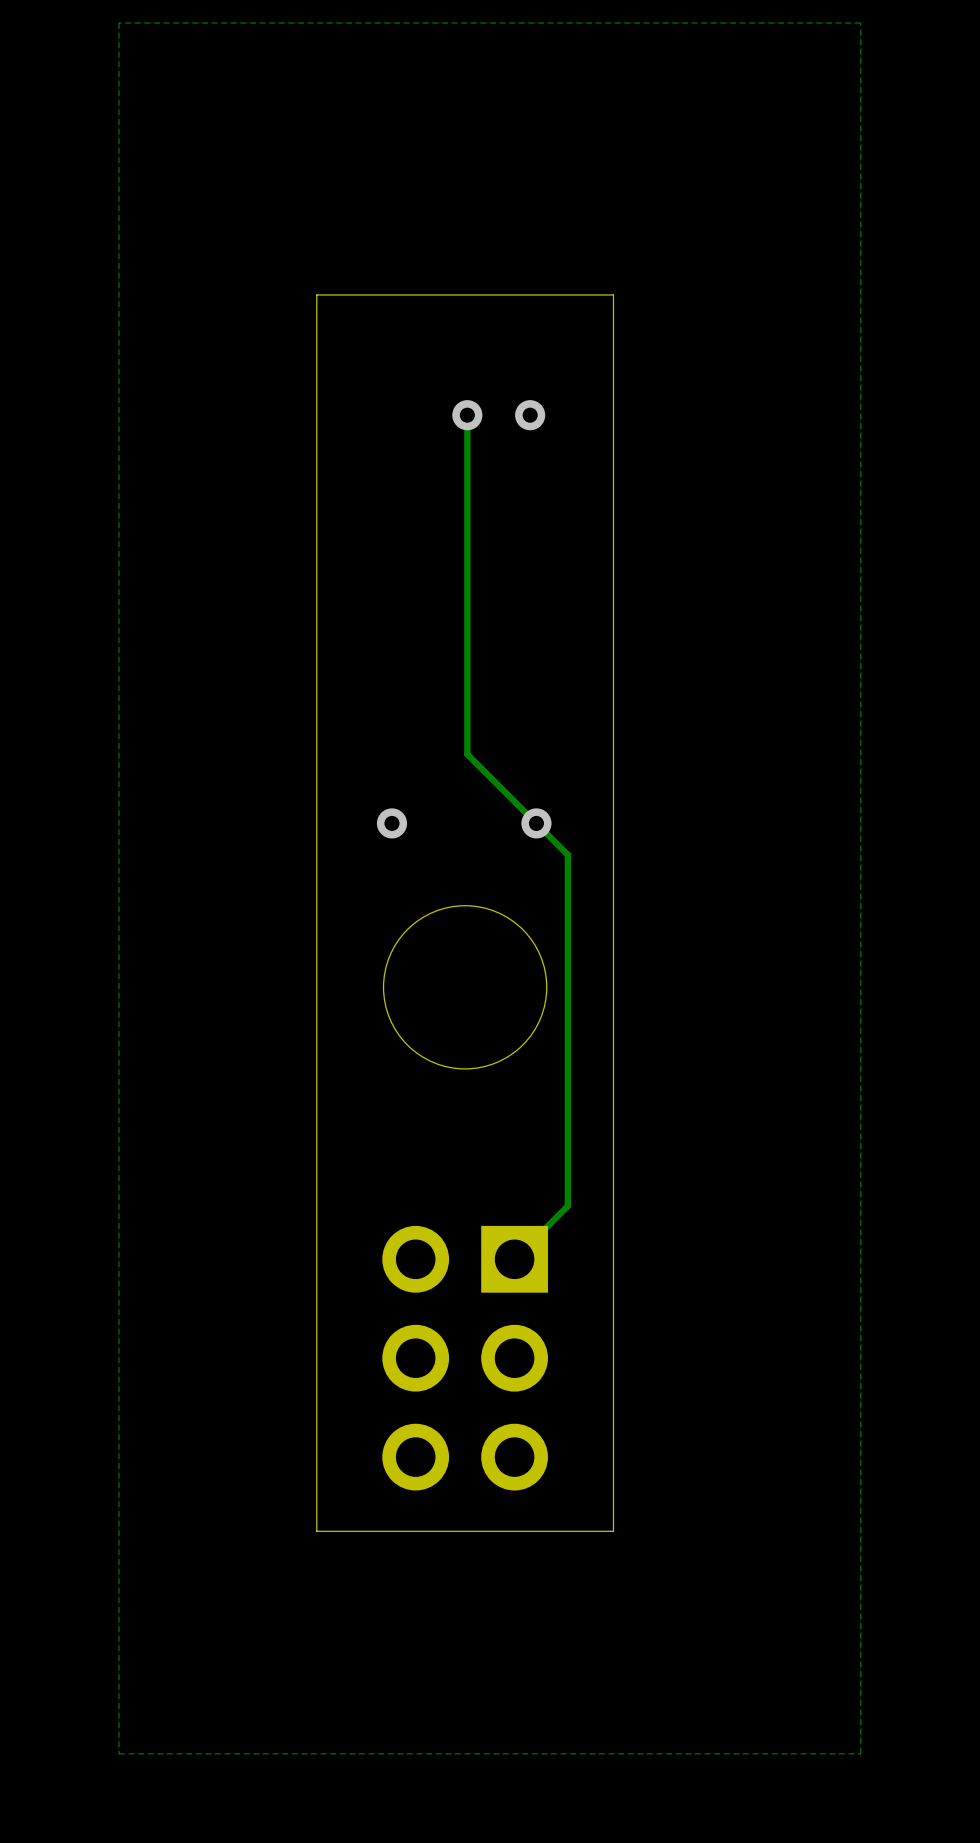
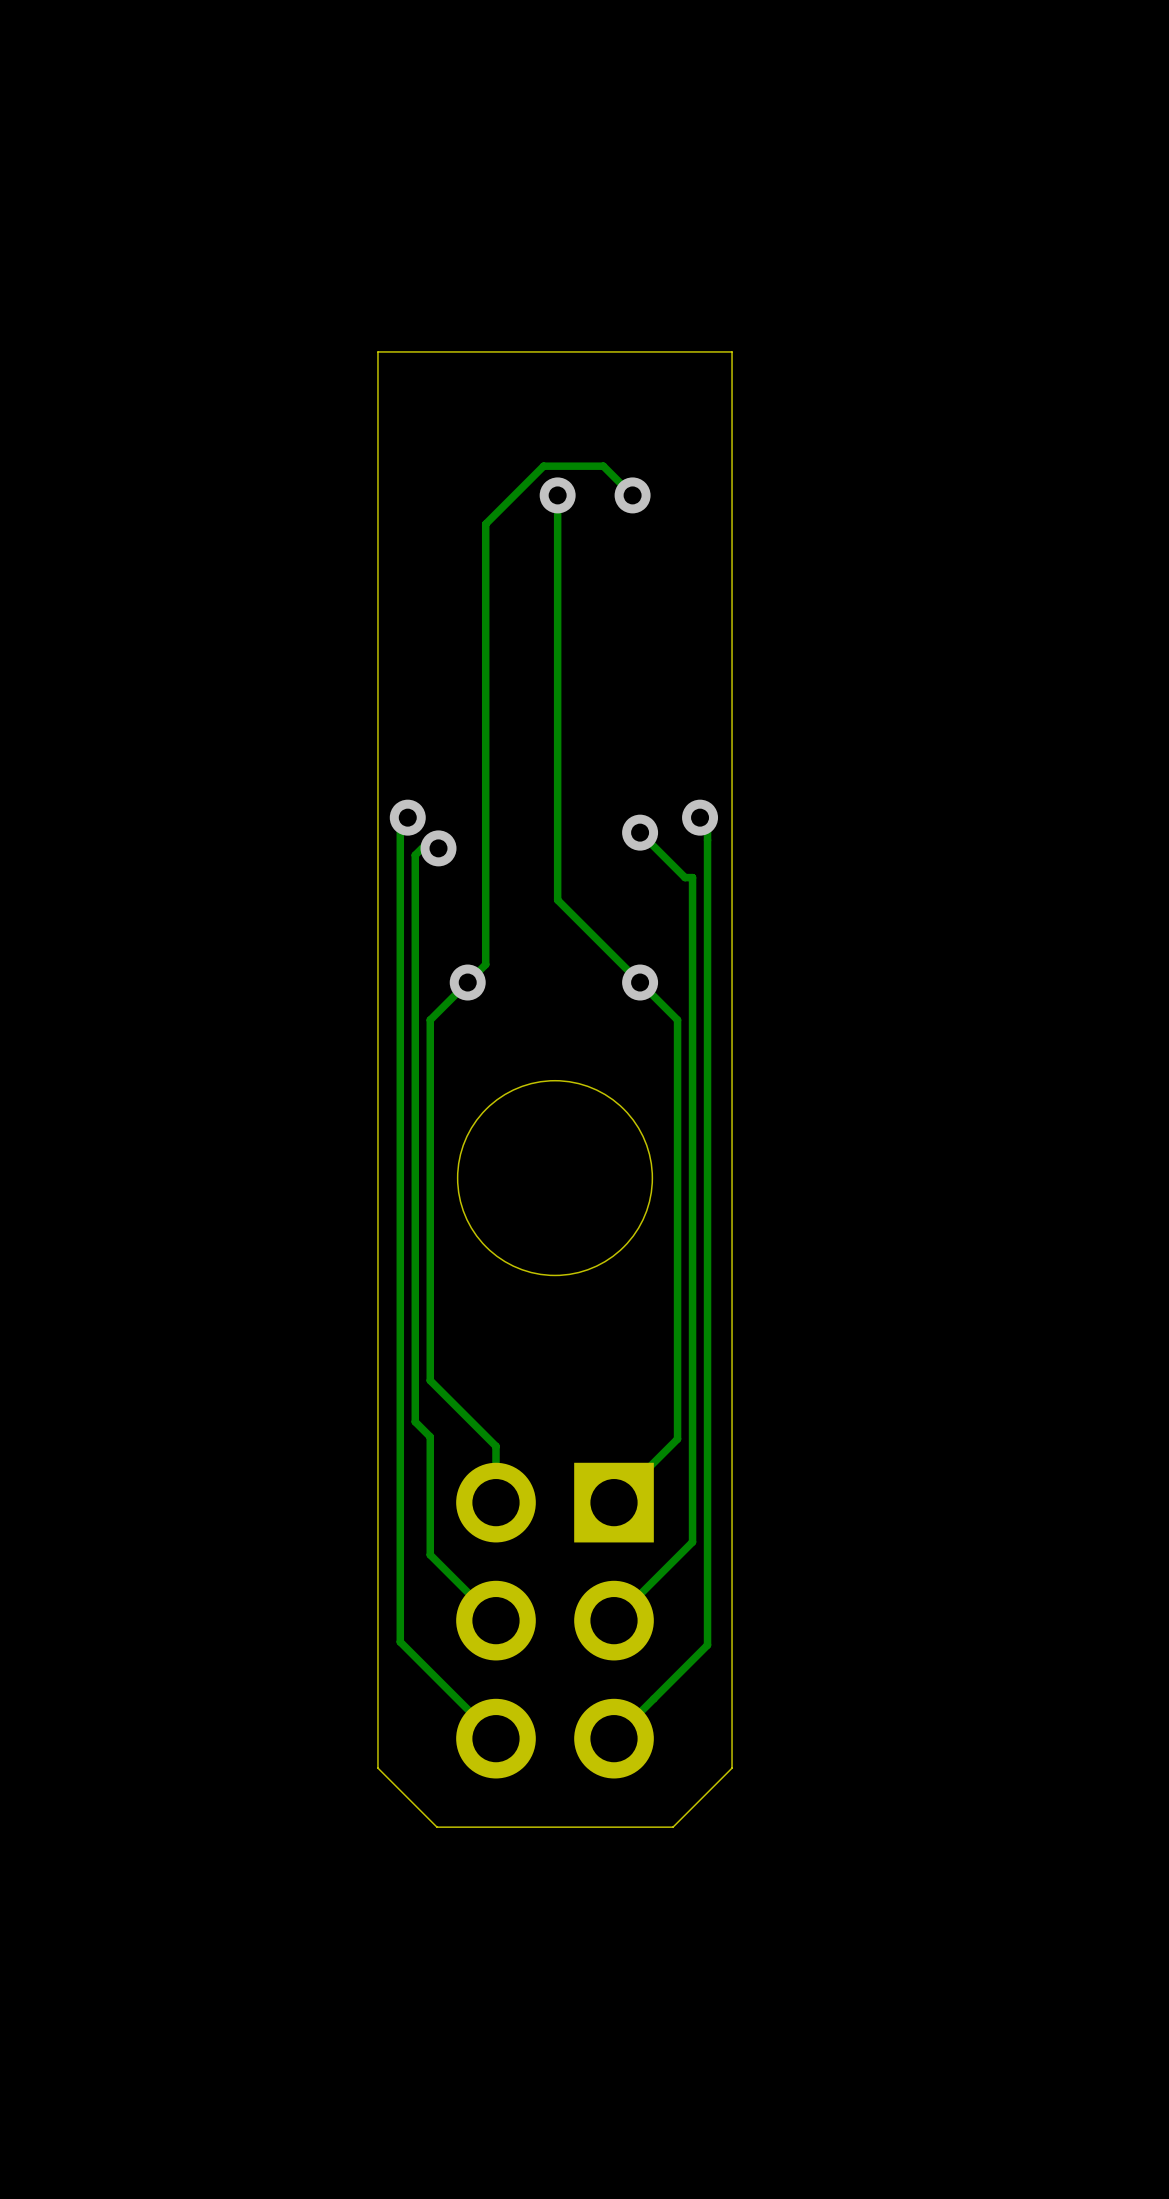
zone outline: (860, 22) (860, 1753) (118, 1753) (118, 22) (860, 22) -> none
track: none -> (632, 495) (603, 466) (543, 466) (485, 524) (485, 964) (430, 1019) (430, 1380) (495, 1446) (495, 1502)
track: none -> (407, 817) (400, 825) (400, 1641) (495, 1737)
via: none -> (407, 817)
track: none -> (700, 817) (707, 825) (707, 1645) (614, 1738)
via: none -> (700, 817)
track: none -> (640, 832) (685, 877) (692, 877) (692, 1542) (614, 1620)
via: none -> (640, 832)
track: none -> (430, 840) (415, 855) (415, 1421) (430, 1436) (430, 1554) (495, 1620)
via: none -> (438, 848)
board edge: (316, 1481) (316, 1531) (366, 1531) -> (377, 1768) (436, 1827)
board edge: (613, 1481) (613, 1531) (564, 1531) -> (732, 1768) (673, 1827)

